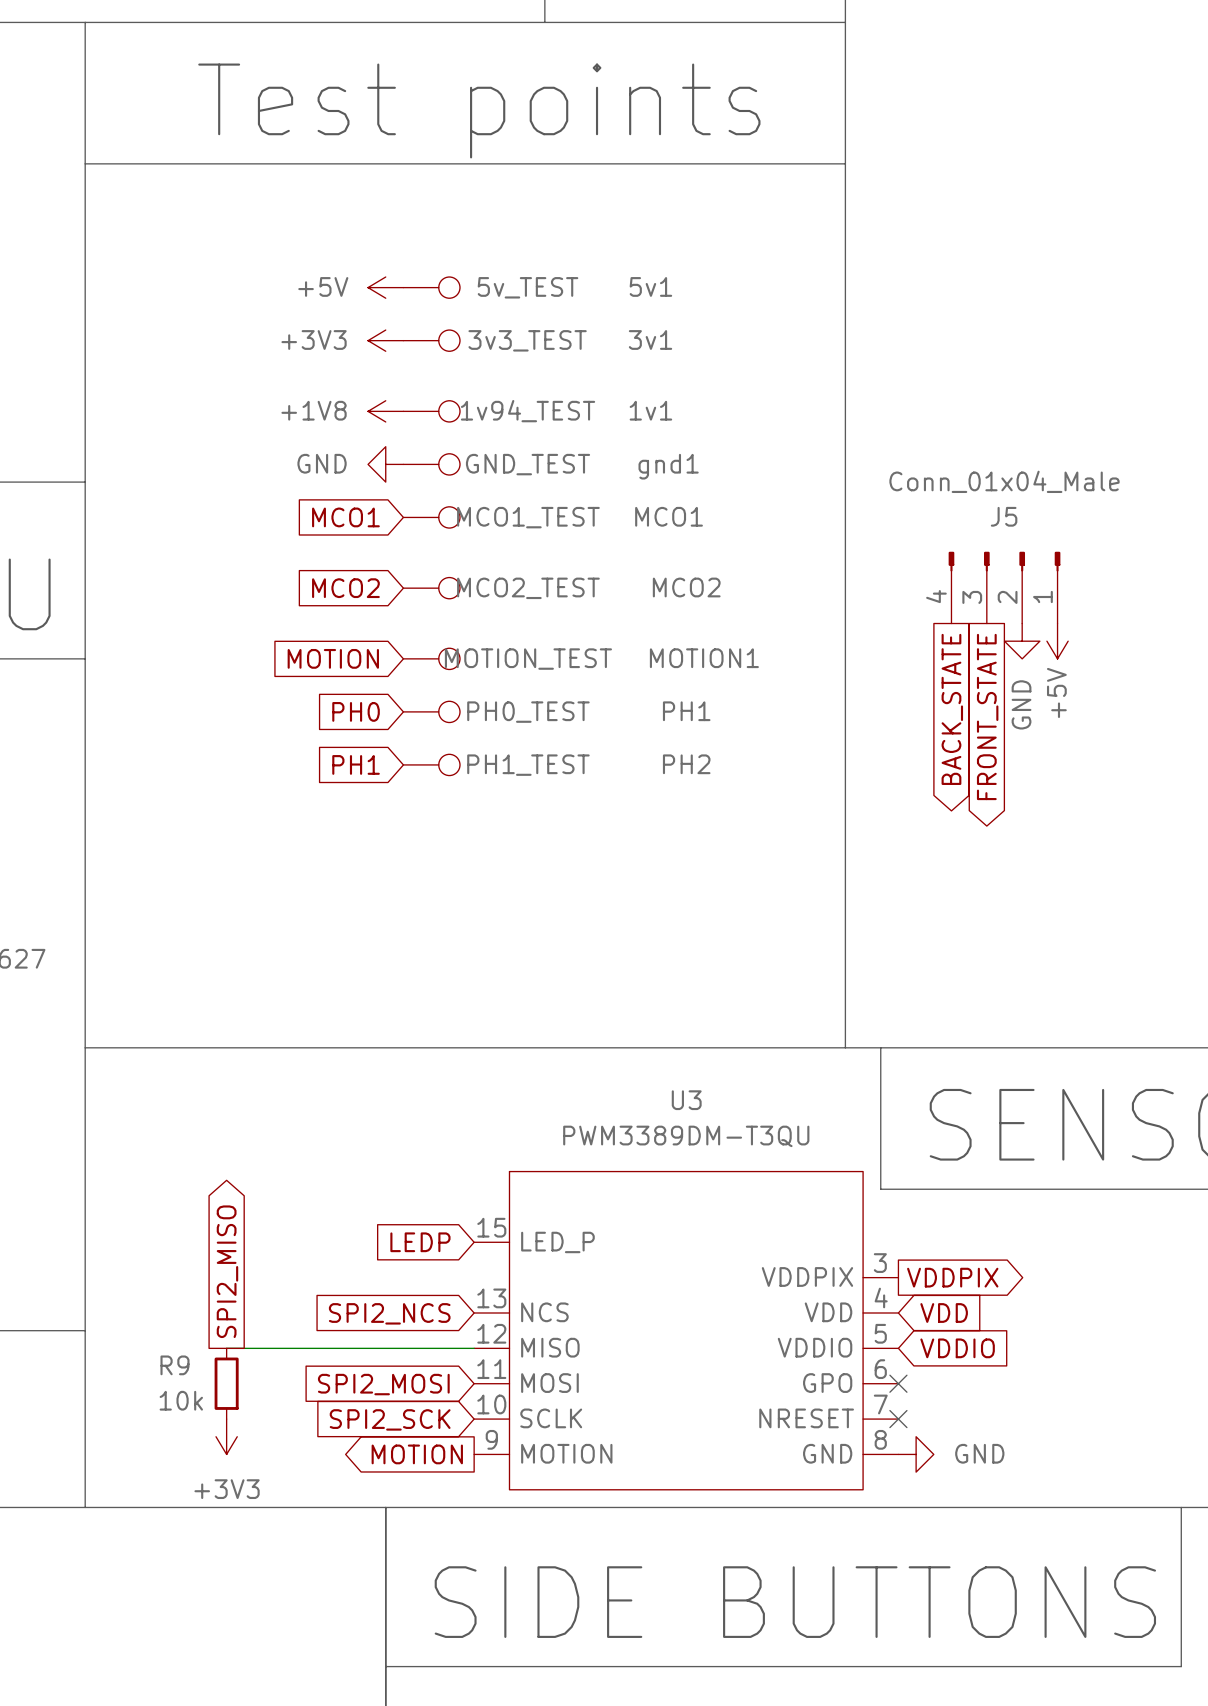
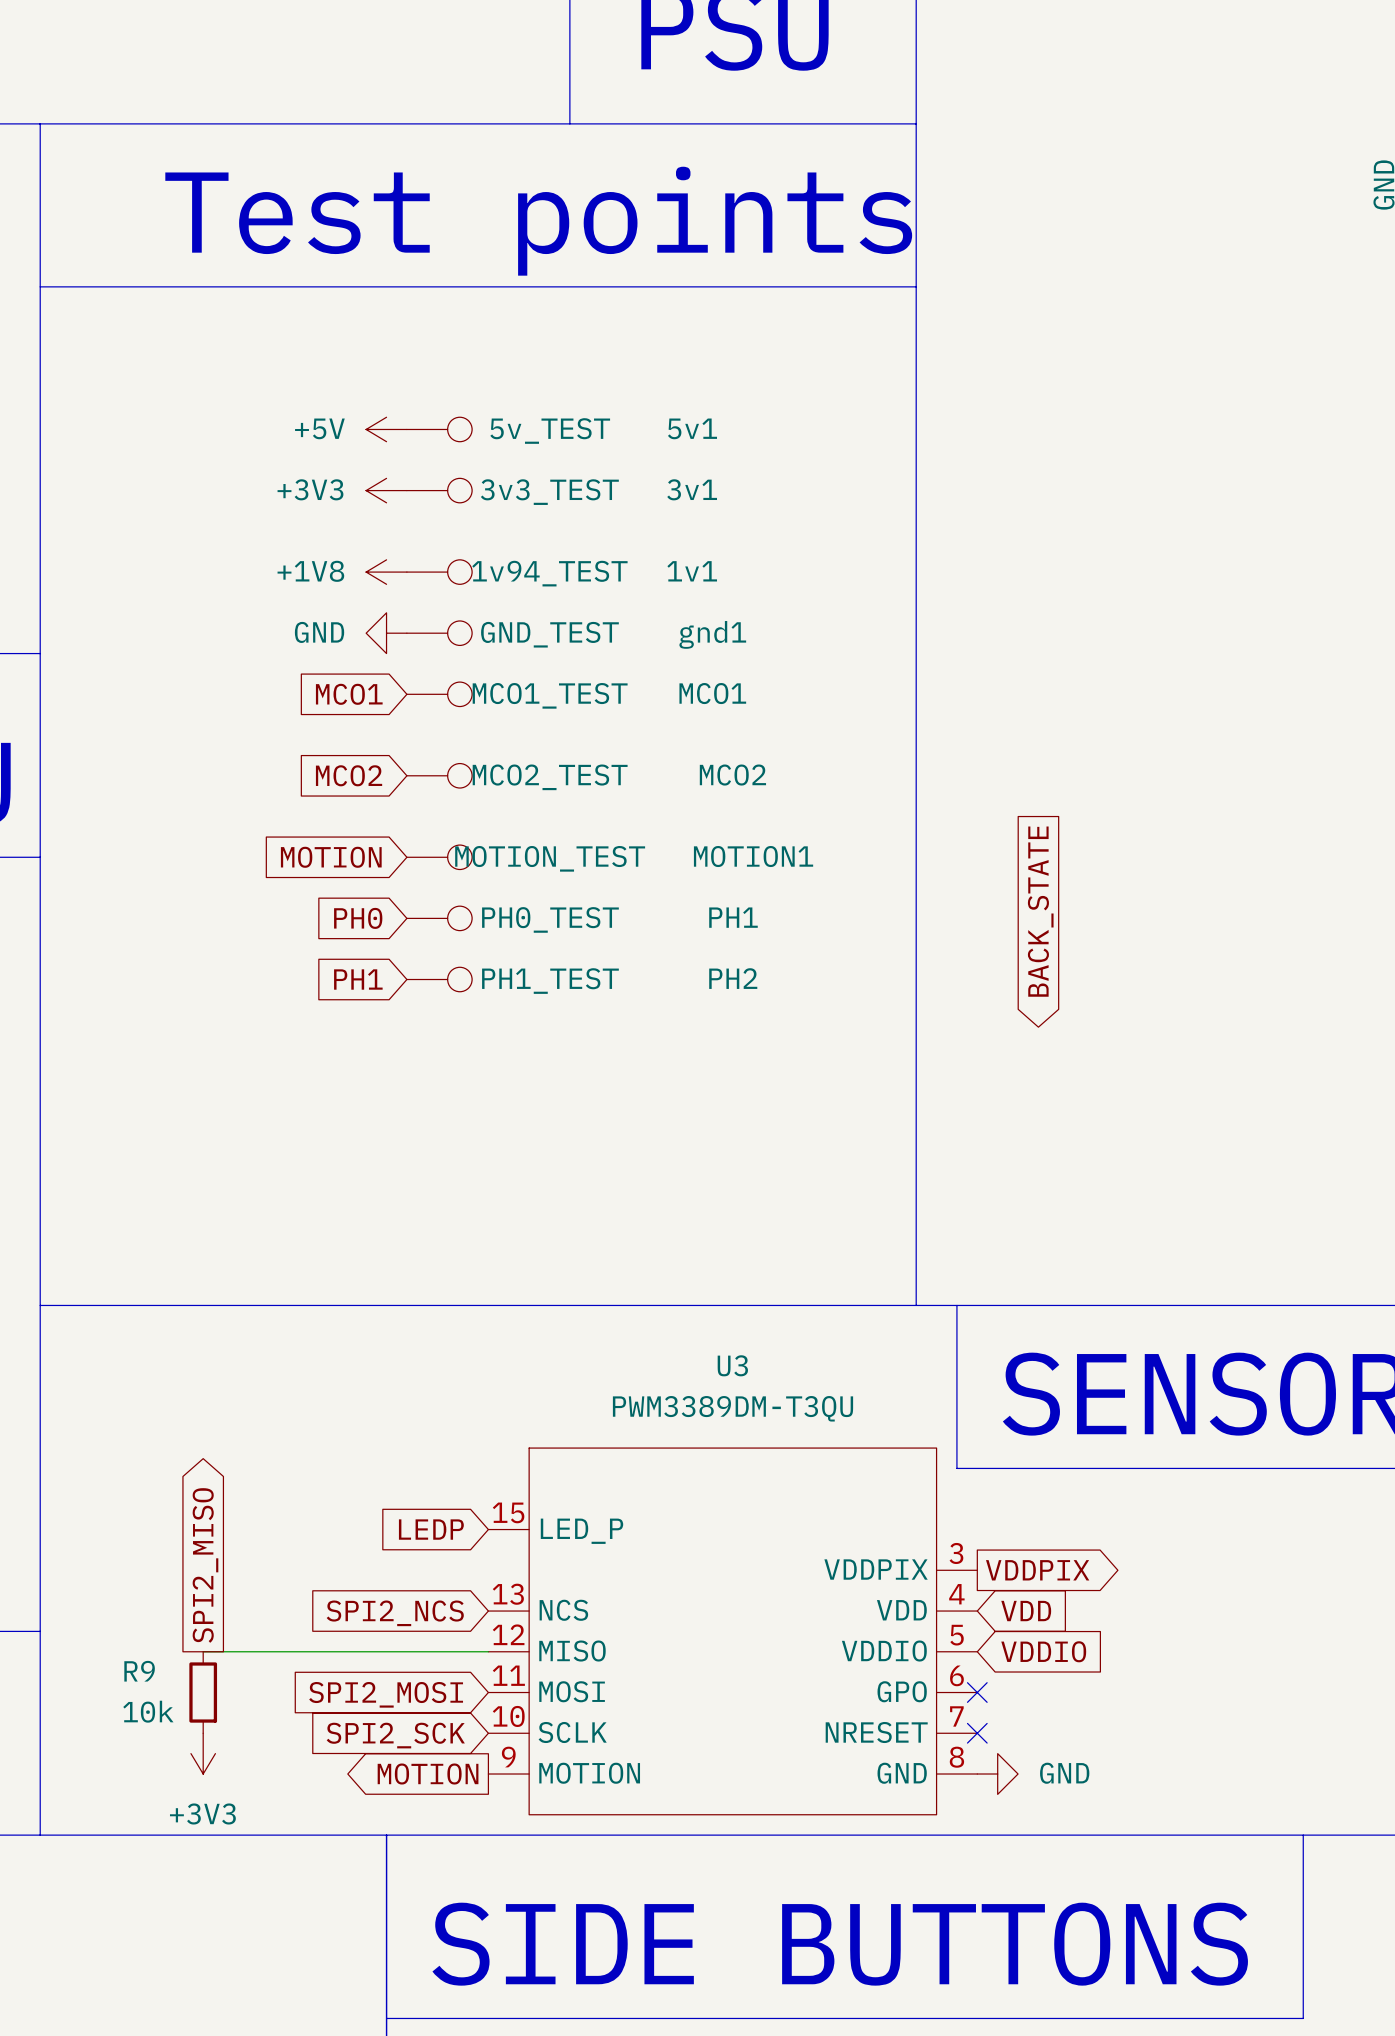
J5: Conn_01x04_Male (1004, 587) -> none
power symbol: GND (1022, 641) -> none
power symbol: +5V (1057, 641) -> none
global label: FRONT_STATE (987, 716) -> none

